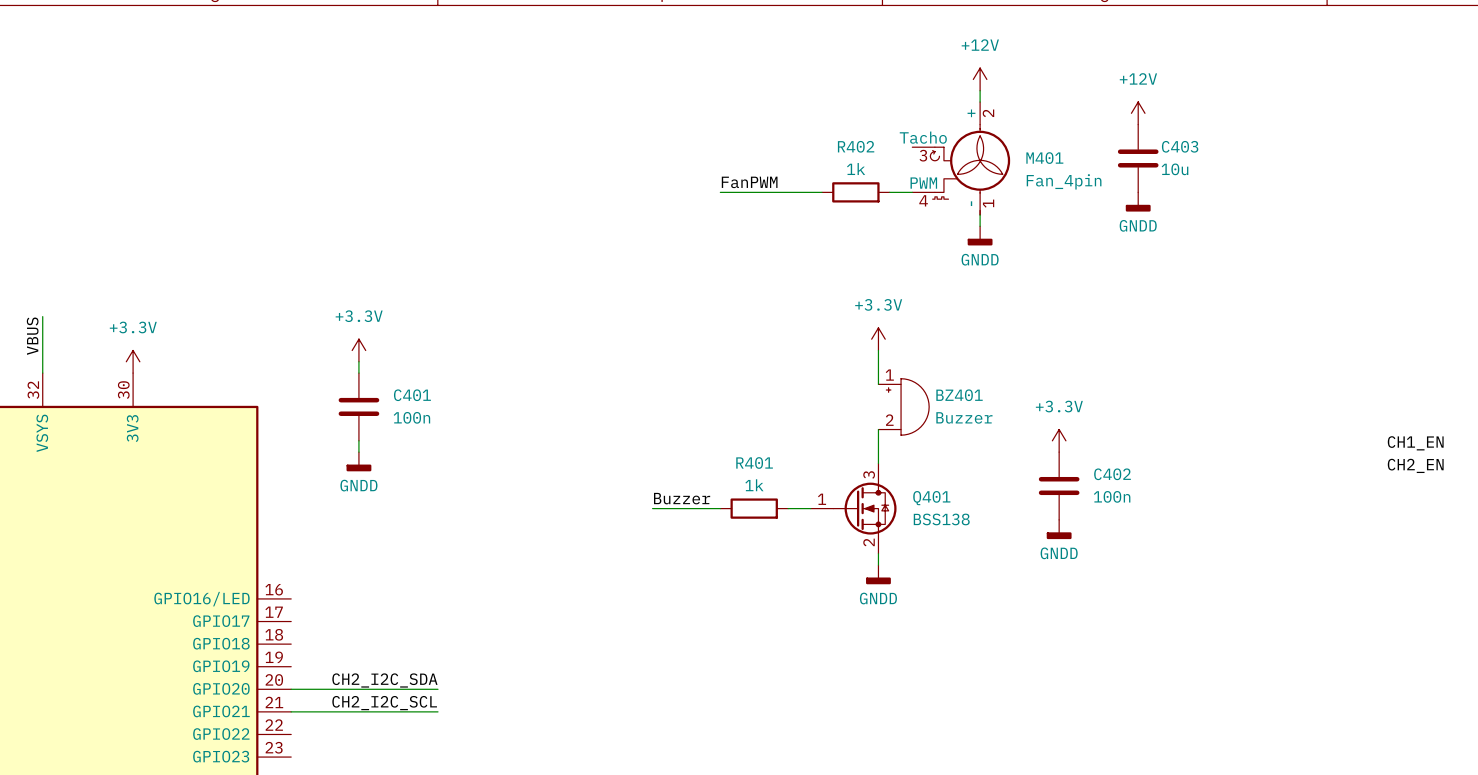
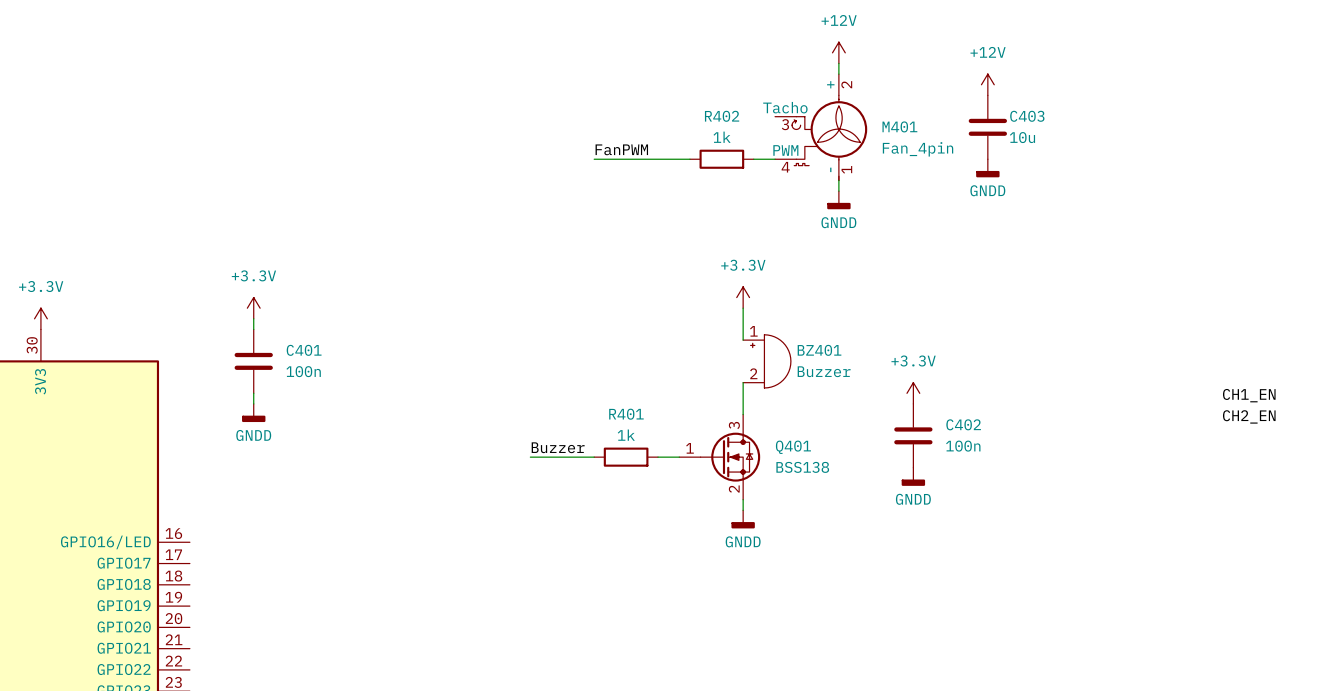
label: CH2_I2C_SDA (384, 680) -> none
wire: (291, 689) (438, 689) -> none
label: CH2_I2C_SCL (384, 703) -> none
wire: (291, 711) (438, 711) -> none

